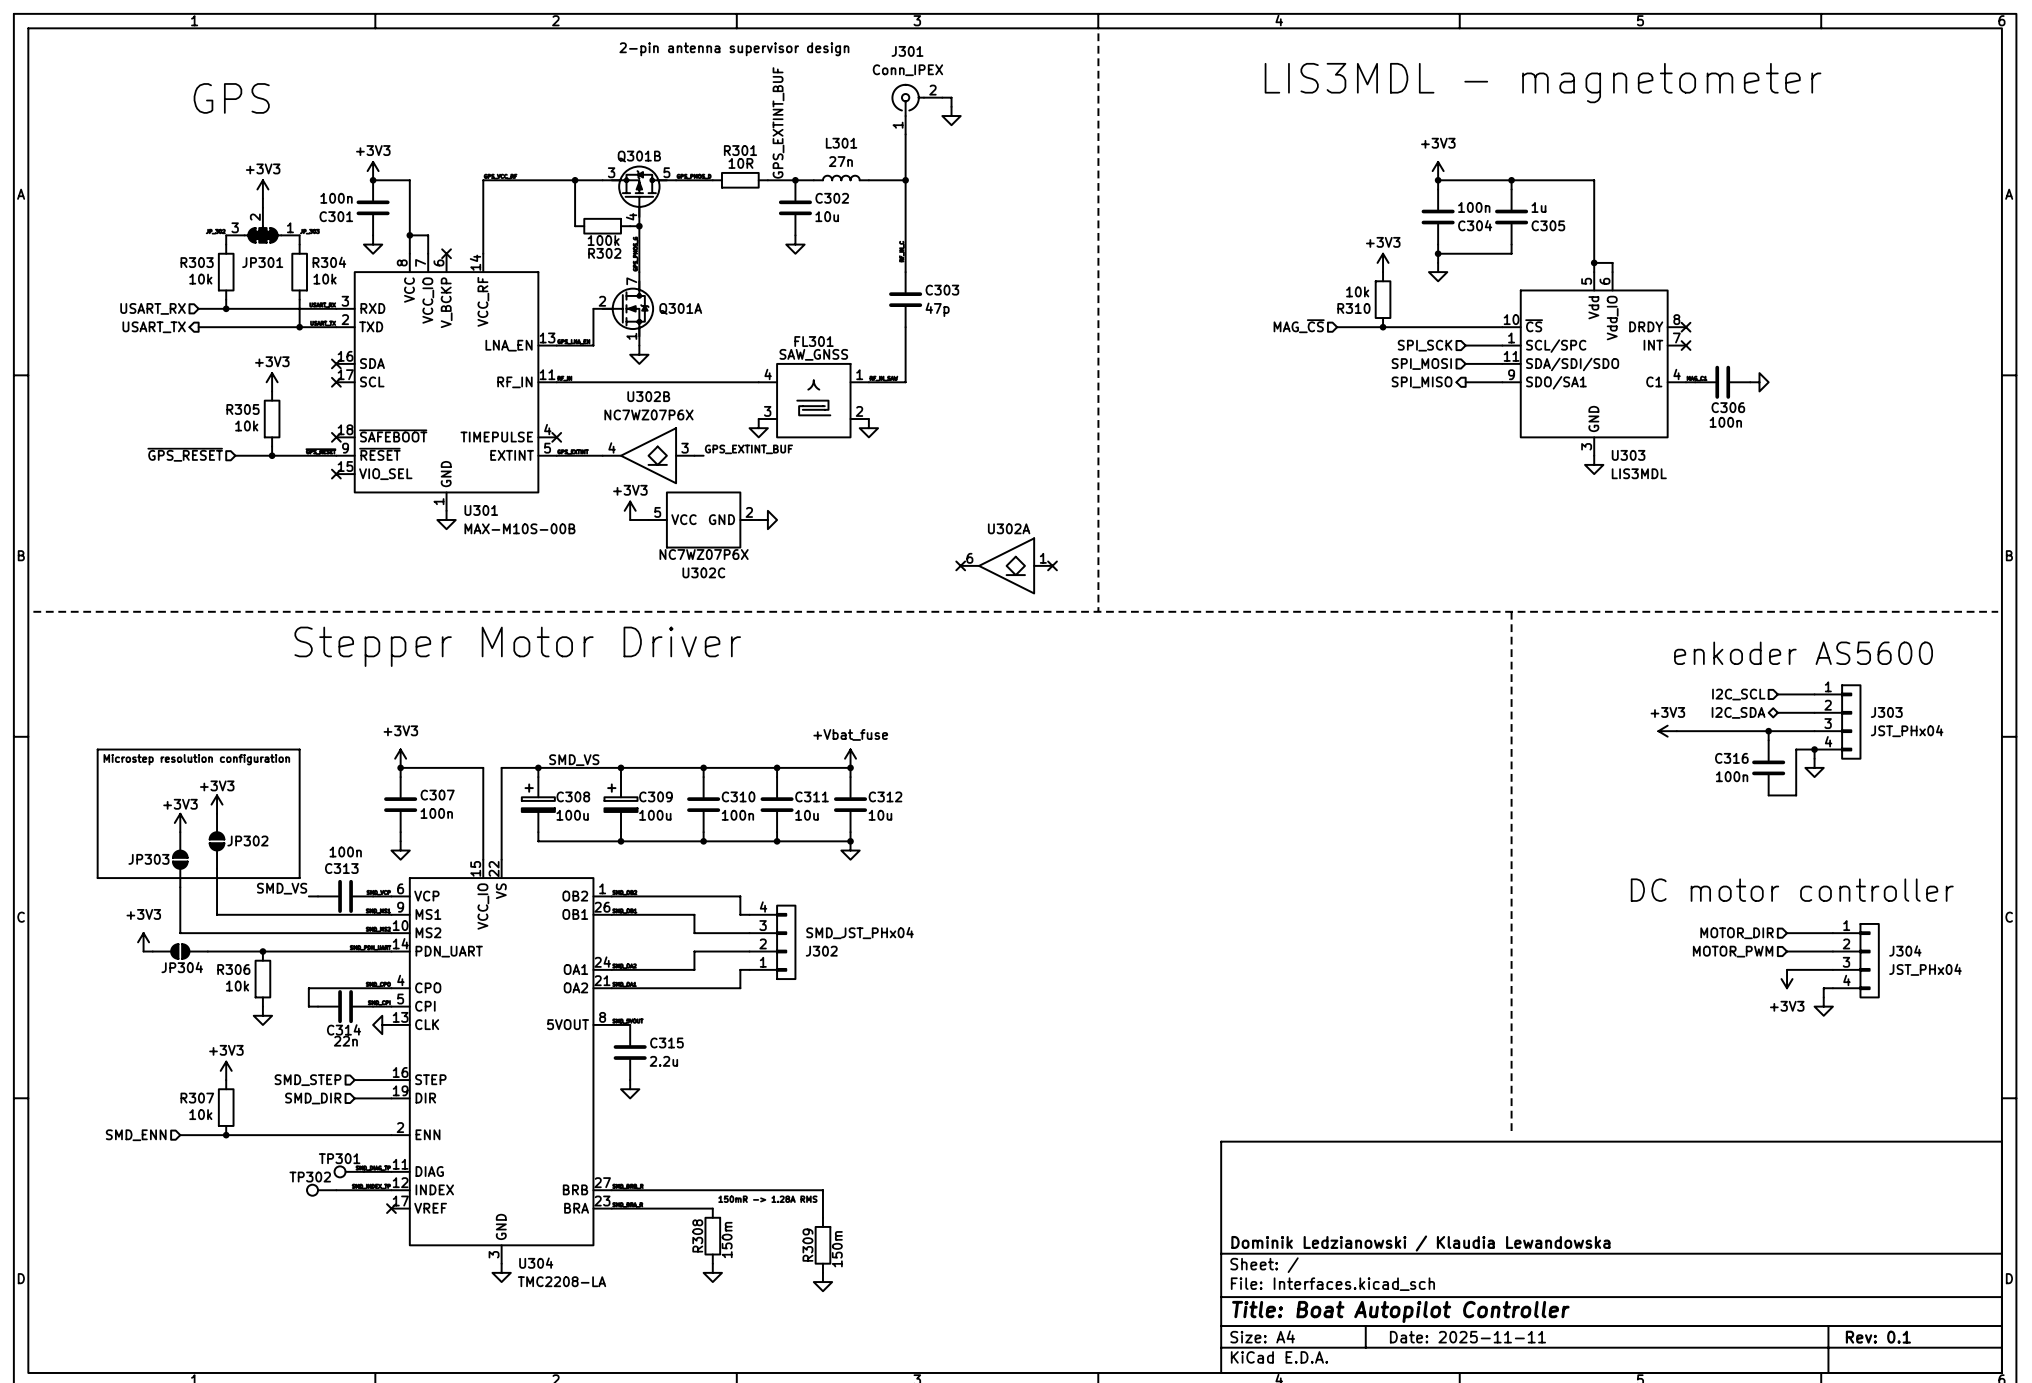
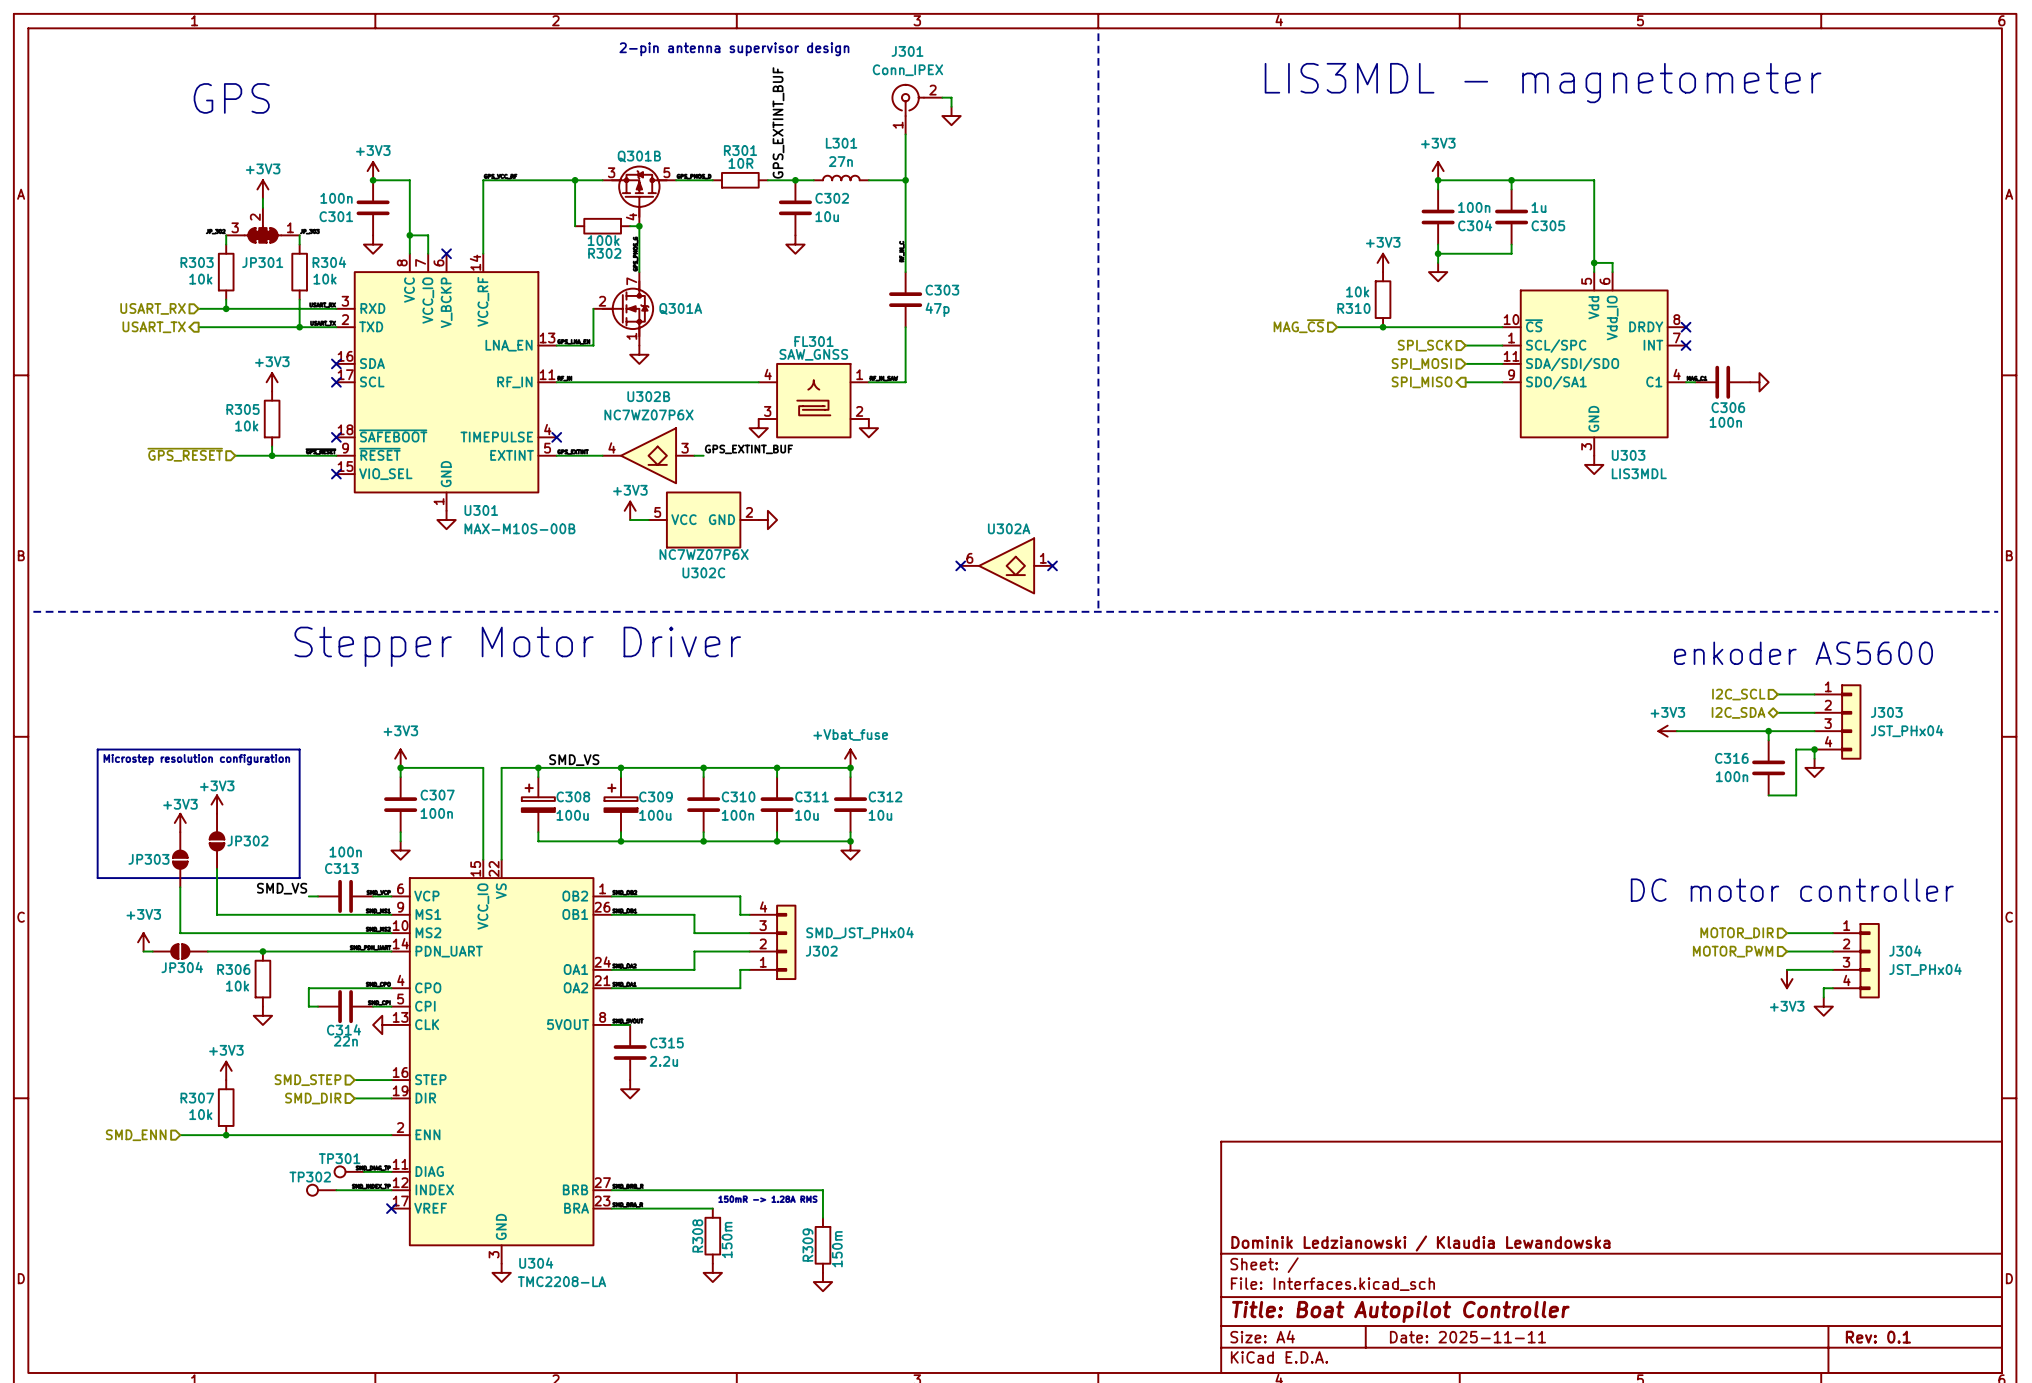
line: (1511, 611) (1511, 1135) -> none

